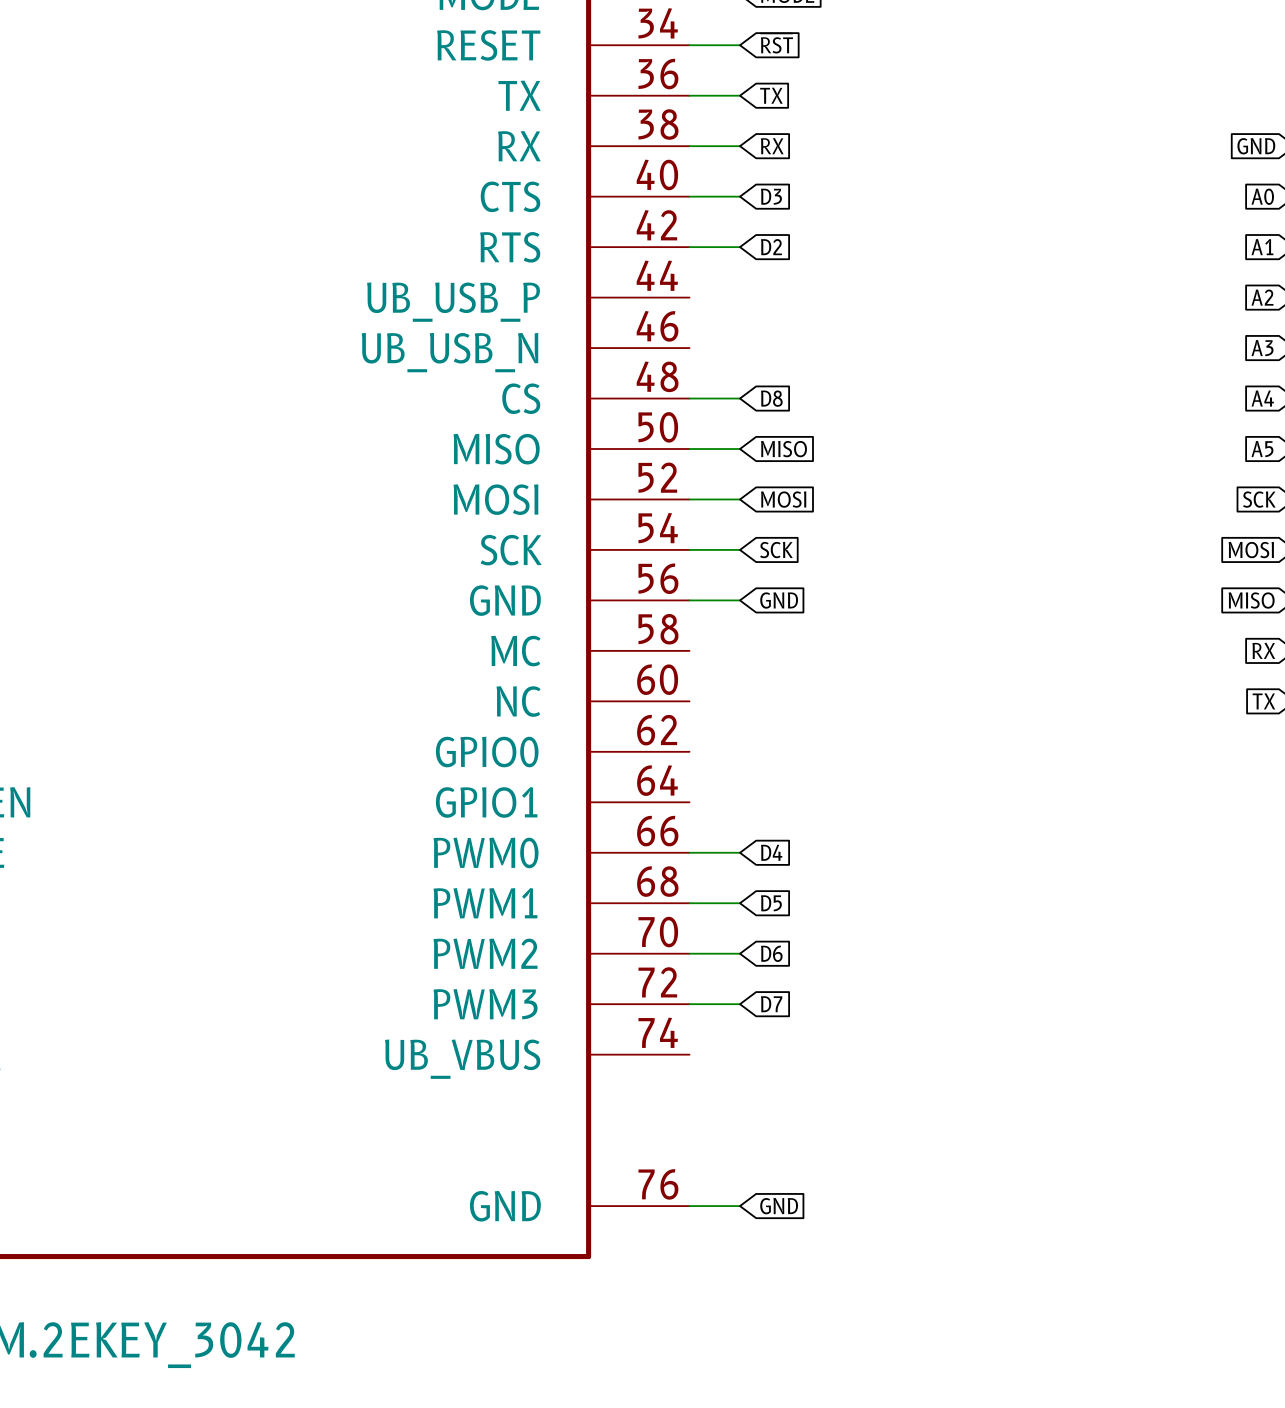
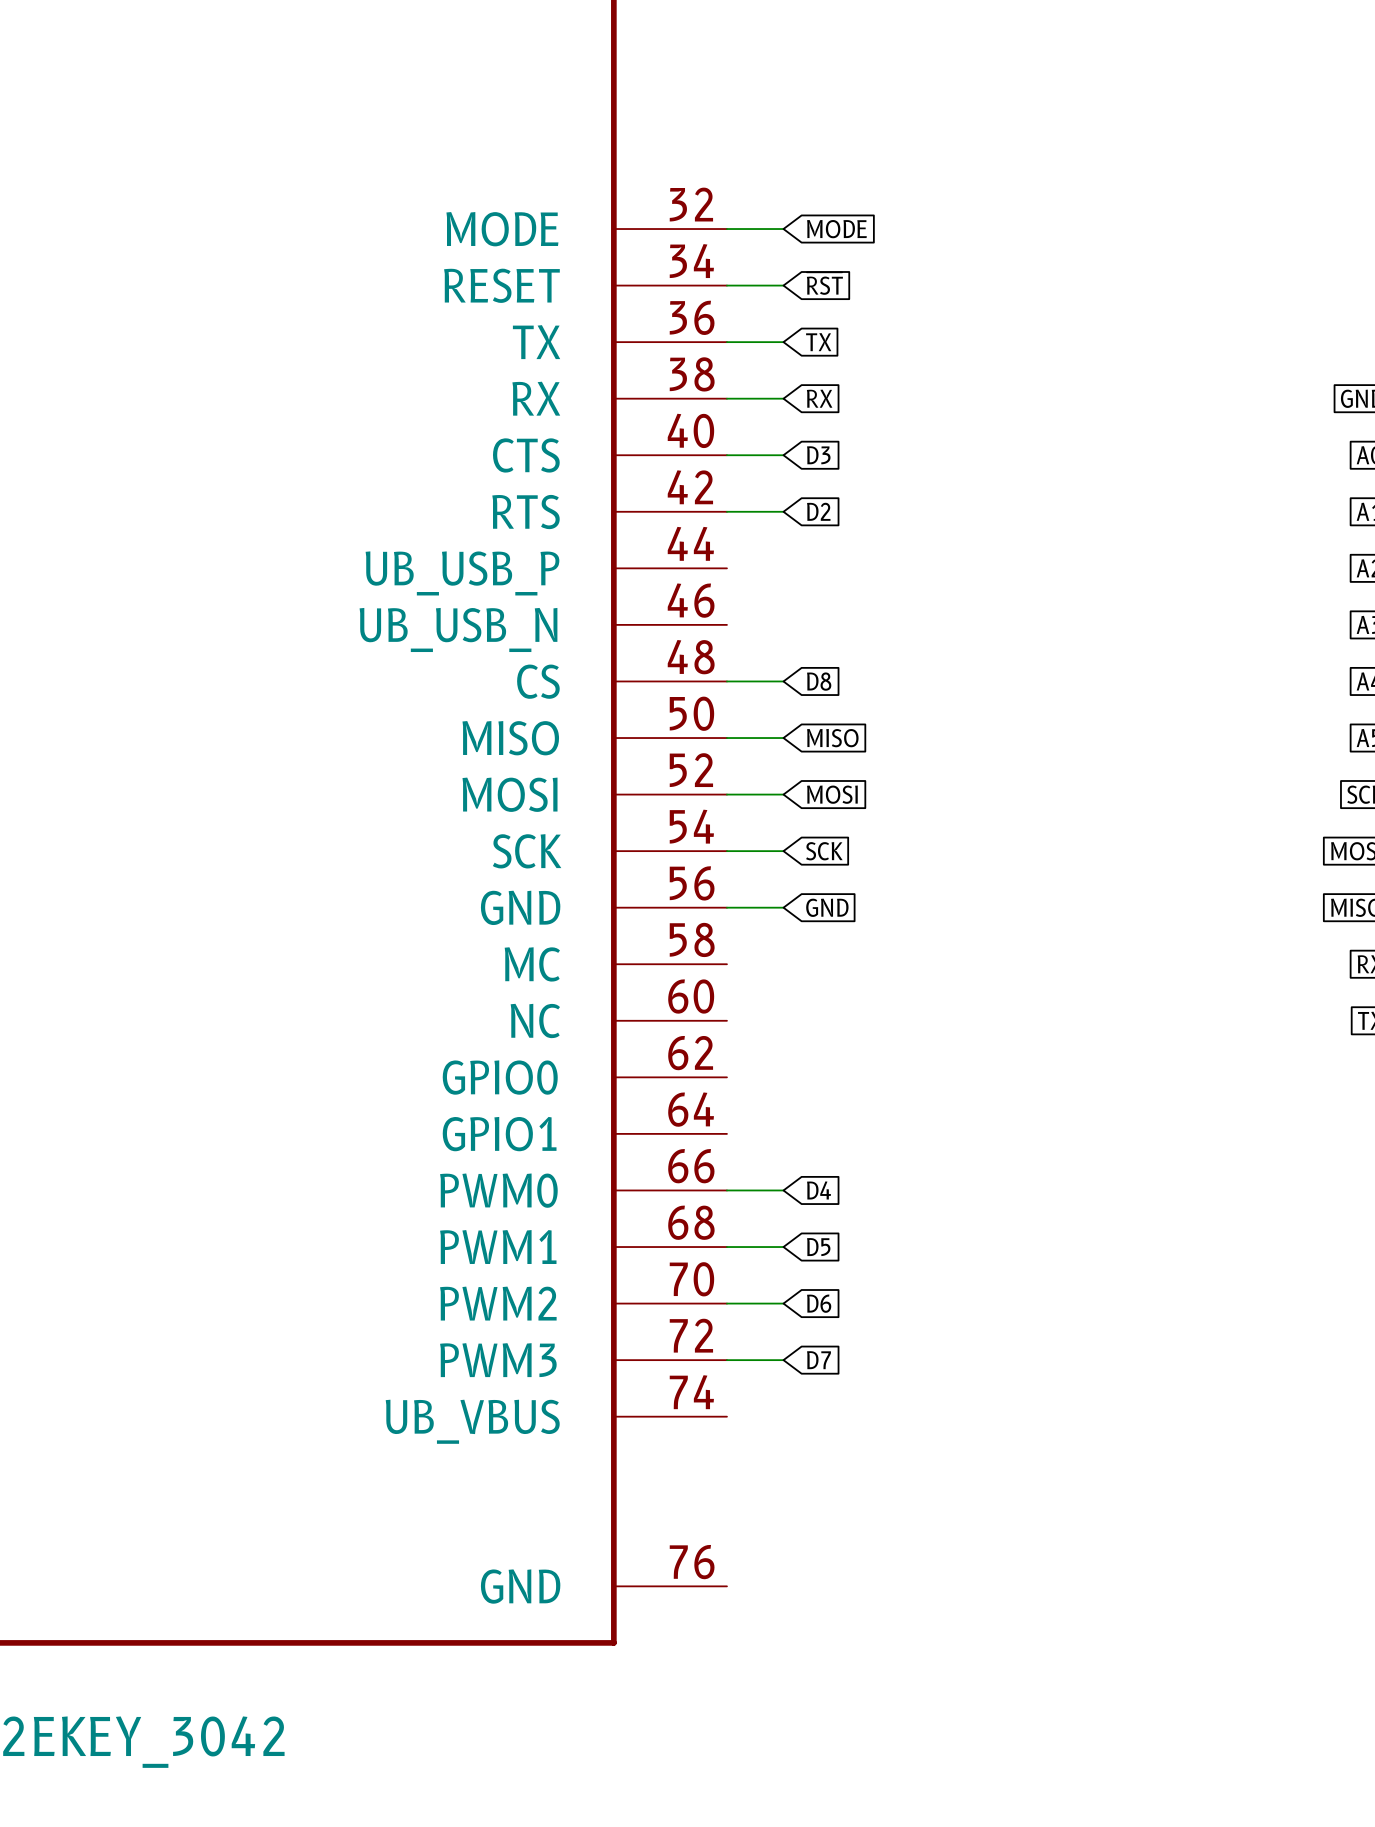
wire: (689, 1206) (740, 1206) -> none
global label: GND (779, 1206) -> none

